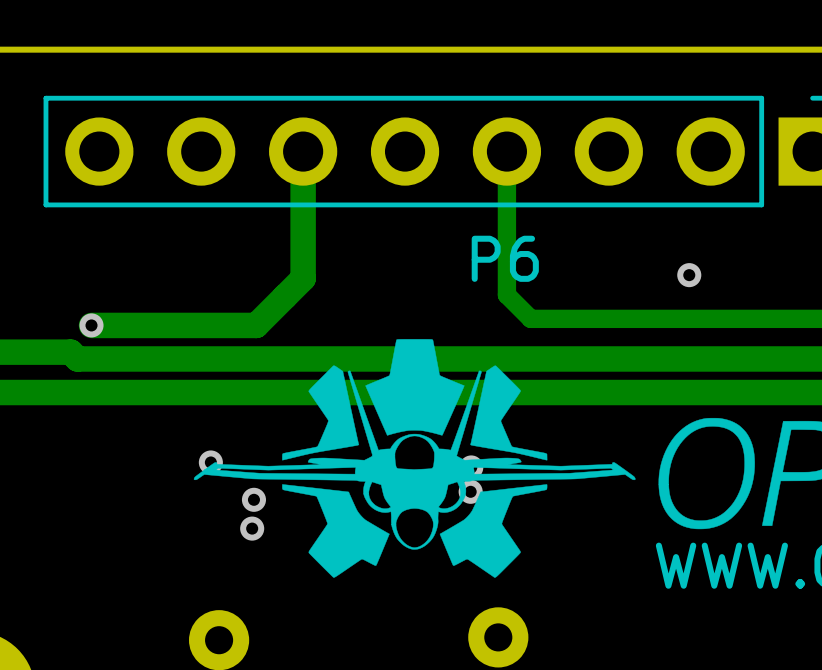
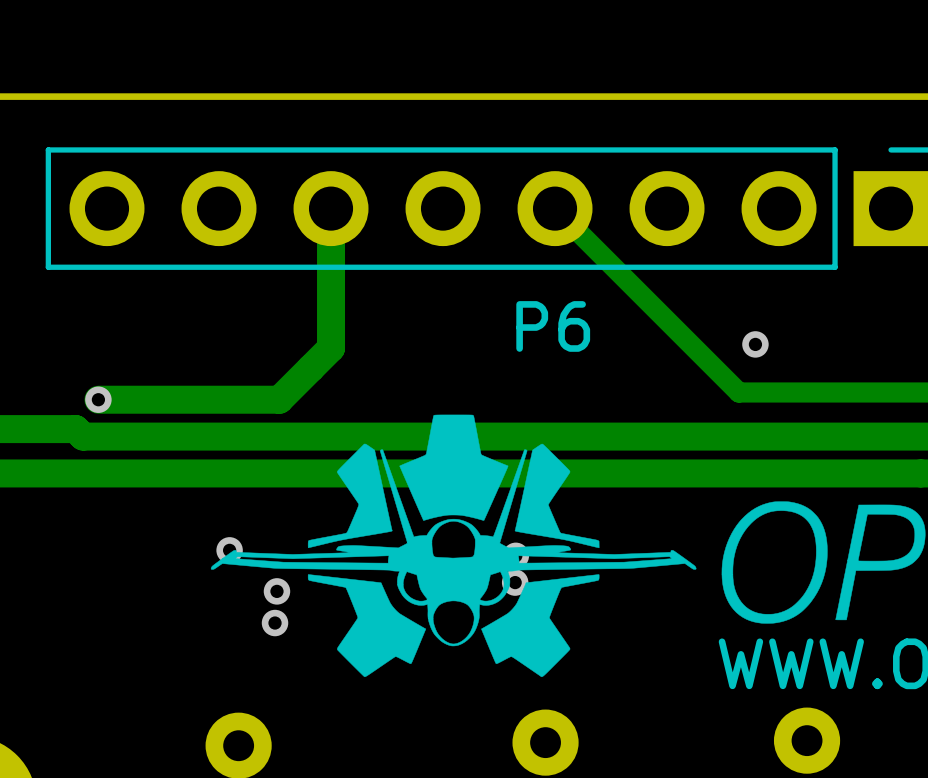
track: (506, 151) (506, 294) (530, 318) (674, 318) -> (555, 208) (738, 392)
part: none -> (807, 740)

